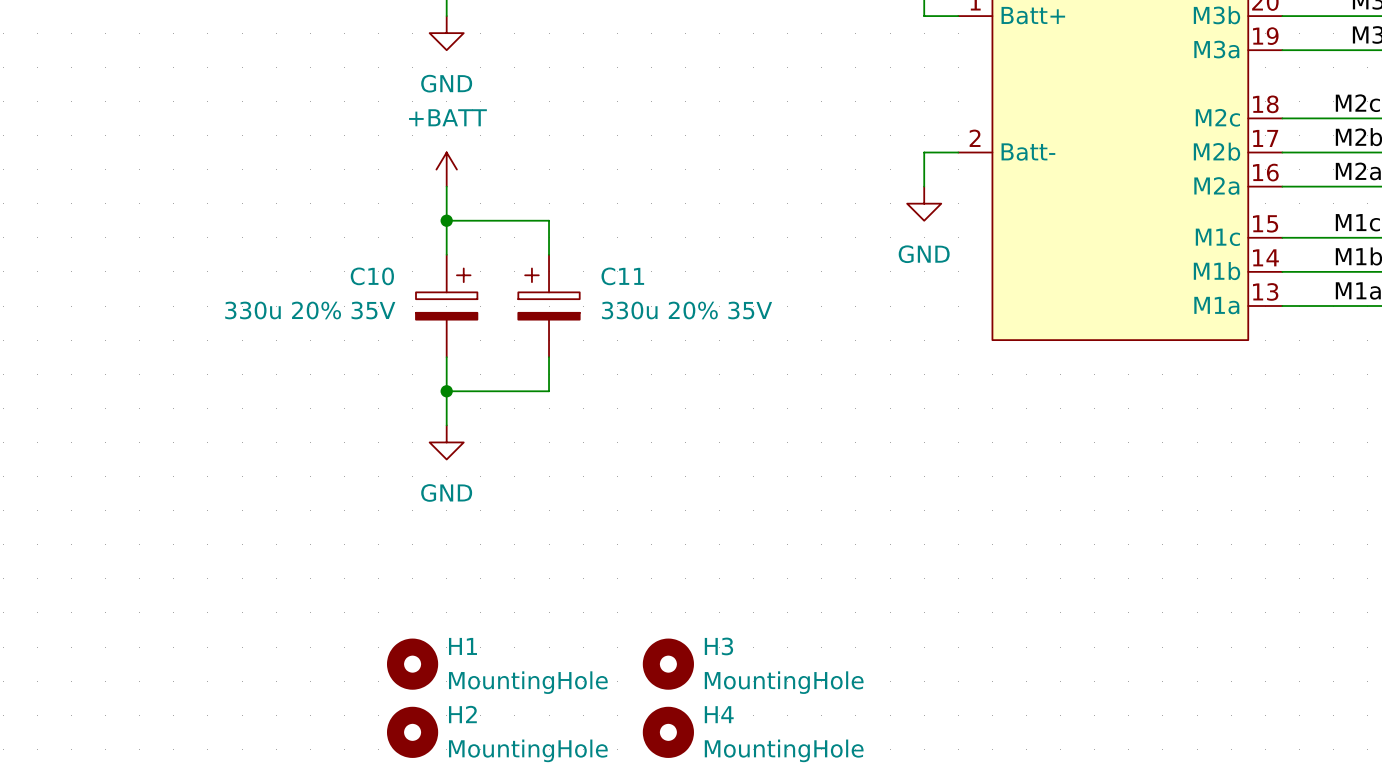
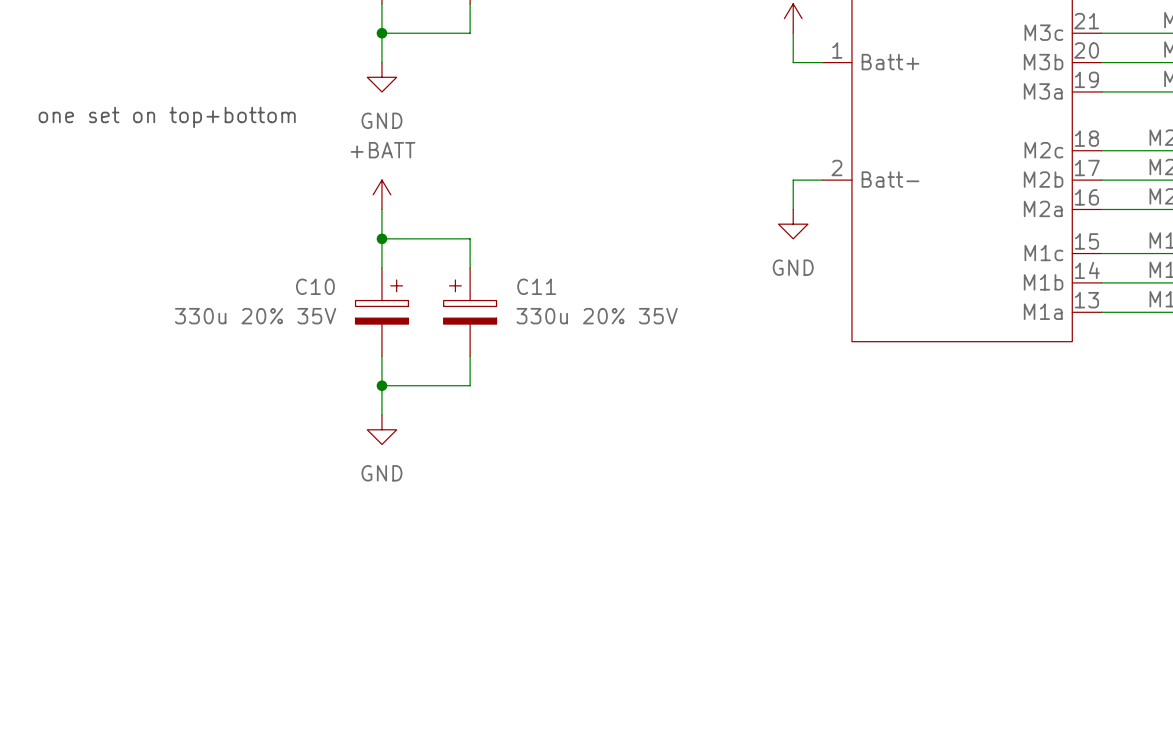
text: none -> one set on top+bottom (167, 117)
H1: MountingHole (412, 664) -> none
H3: MountingHole (668, 664) -> none
H2: MountingHole (412, 732) -> none
H4: MountingHole (668, 732) -> none

